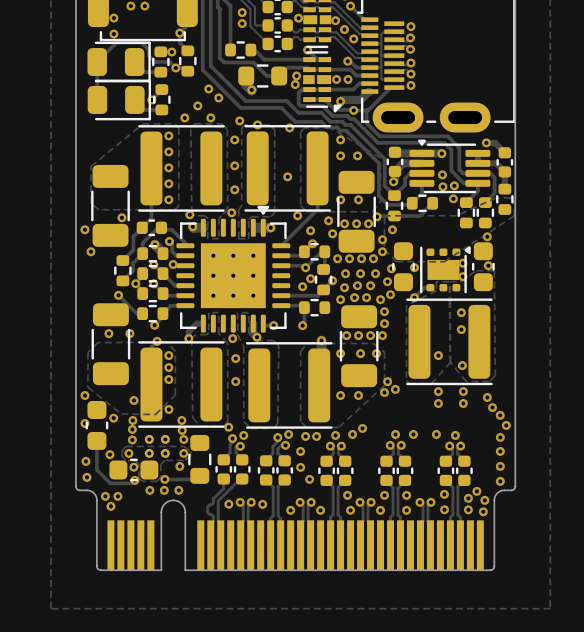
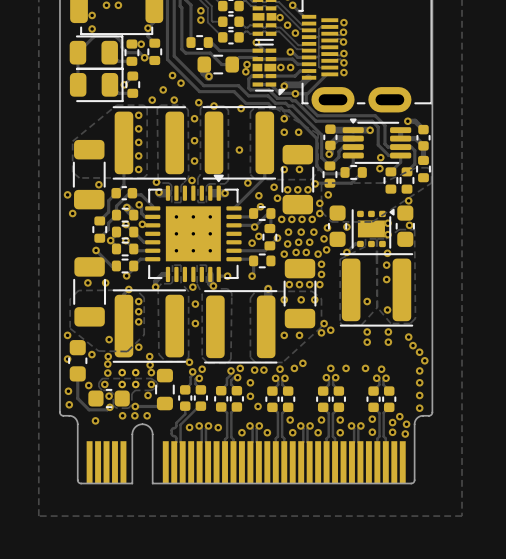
via: (298, 18) -> none
via: (442, 174) -> none
via: (442, 186) -> none
via: none -> (387, 253)
via: (105, 496) -> none
via: (110, 506) -> none

